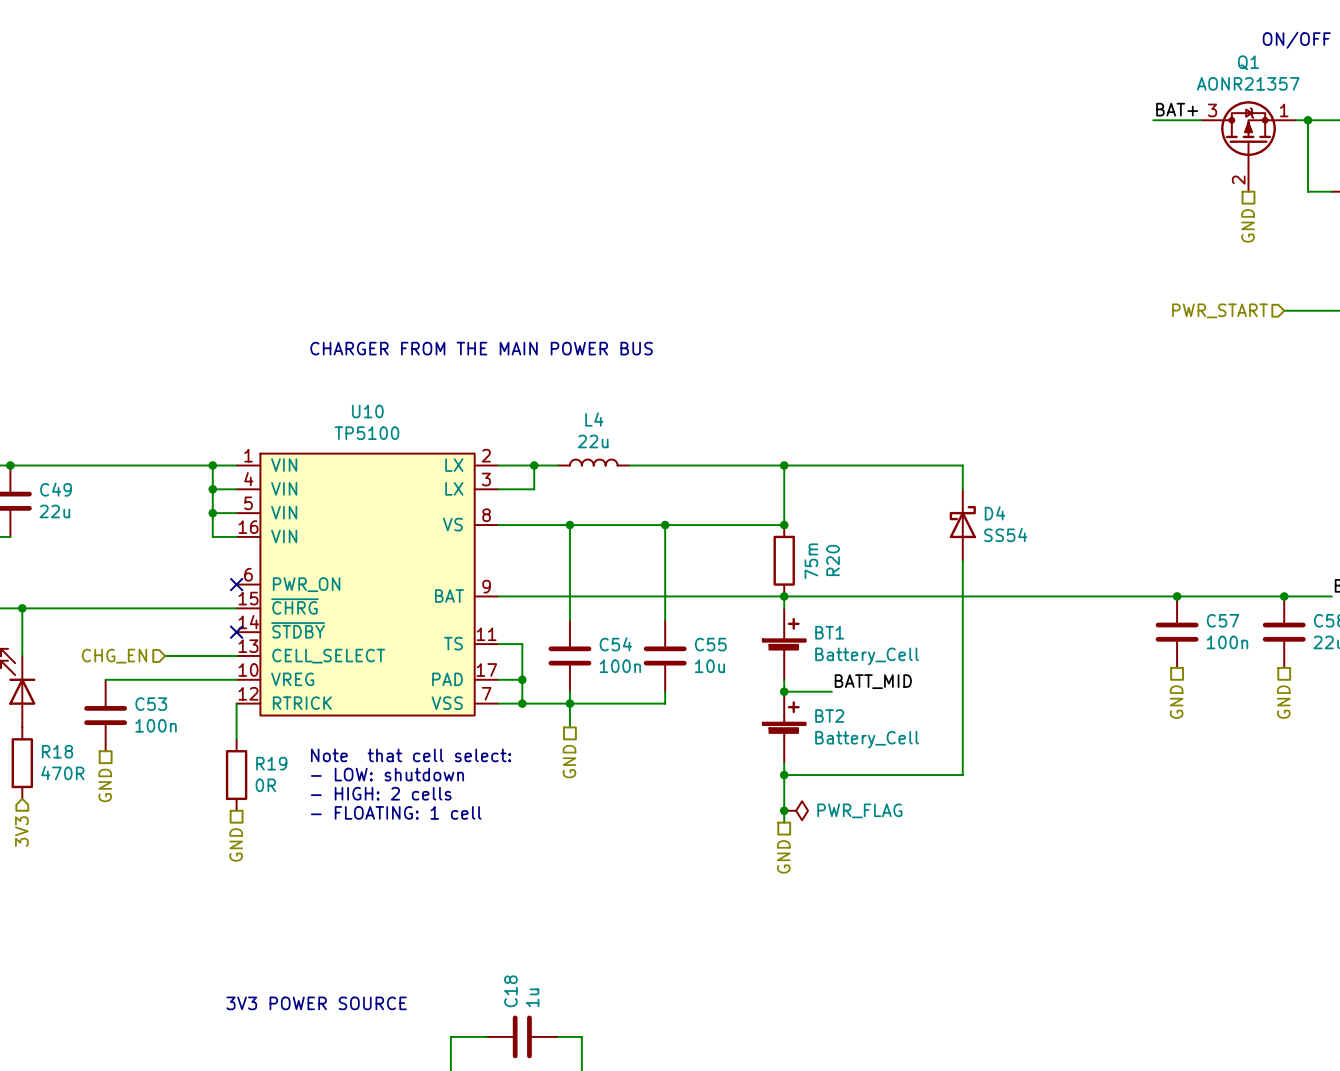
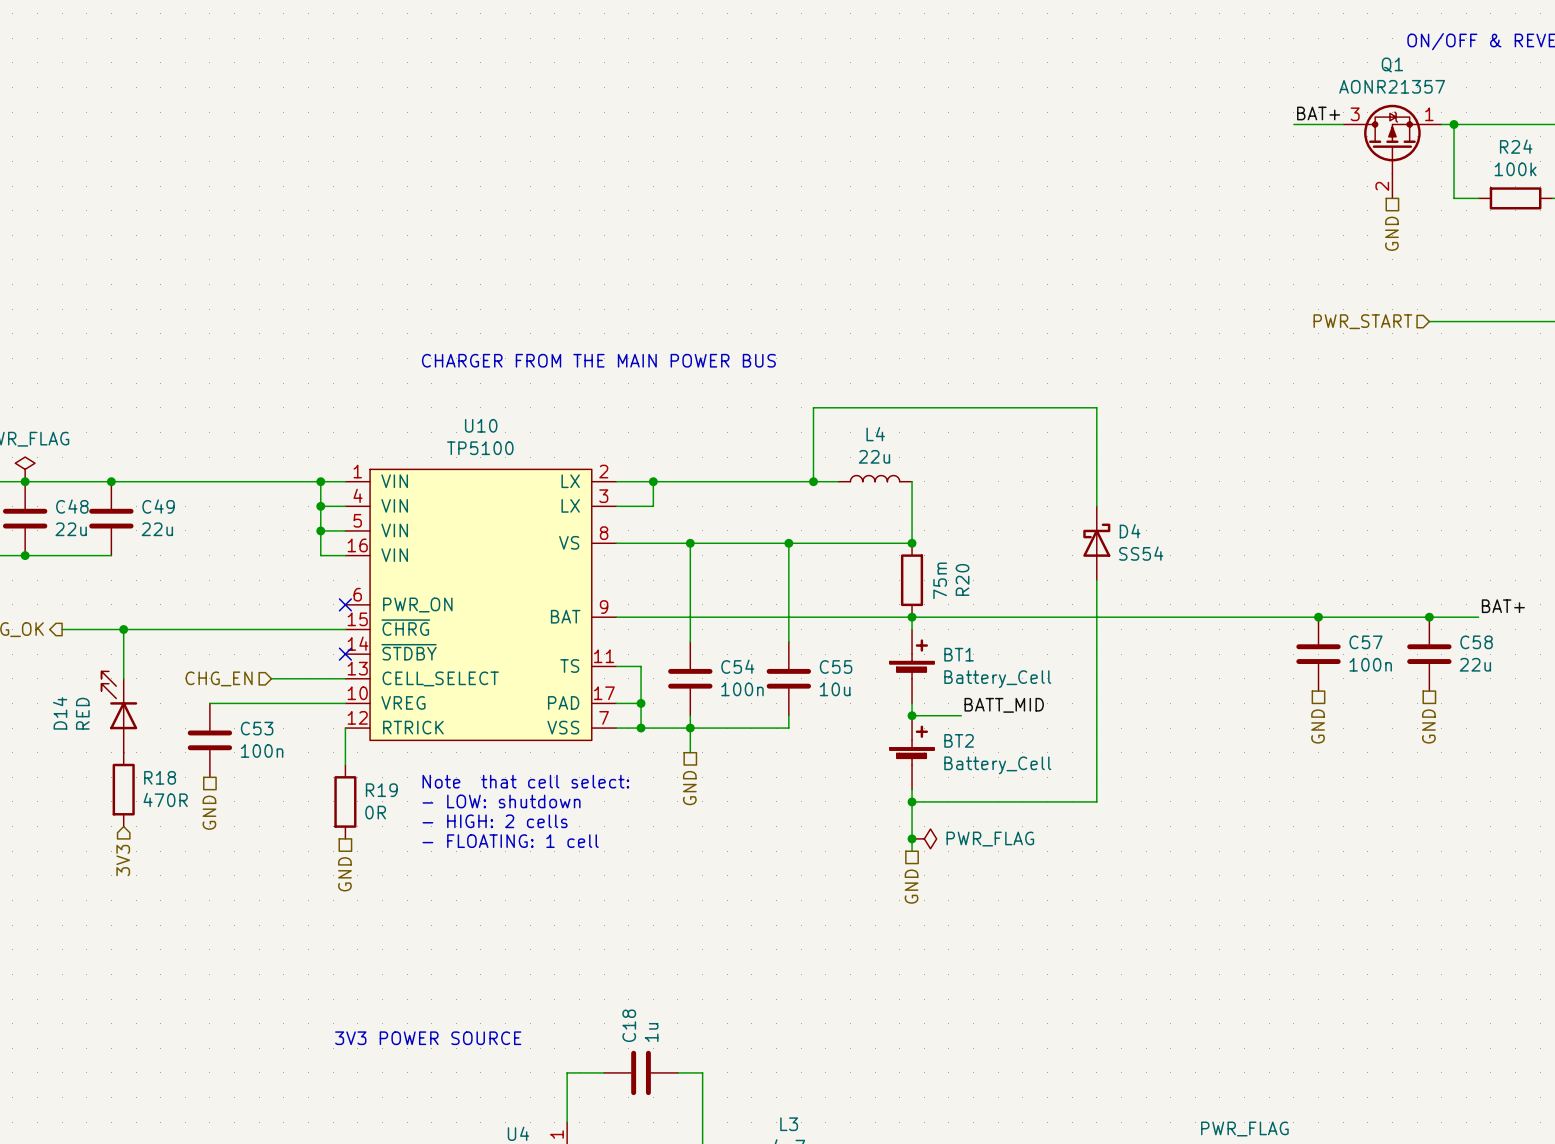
L4 symbol: [558, 459, 630, 466] -> [838, 475, 913, 482]
wire: none -> (677, 481) (751, 481)
junction: none -> (813, 481)
wire: (712, 465) (962, 465) -> (813, 481) (813, 407) (1096, 407) (1096, 481)
junction: (784, 465) -> none

